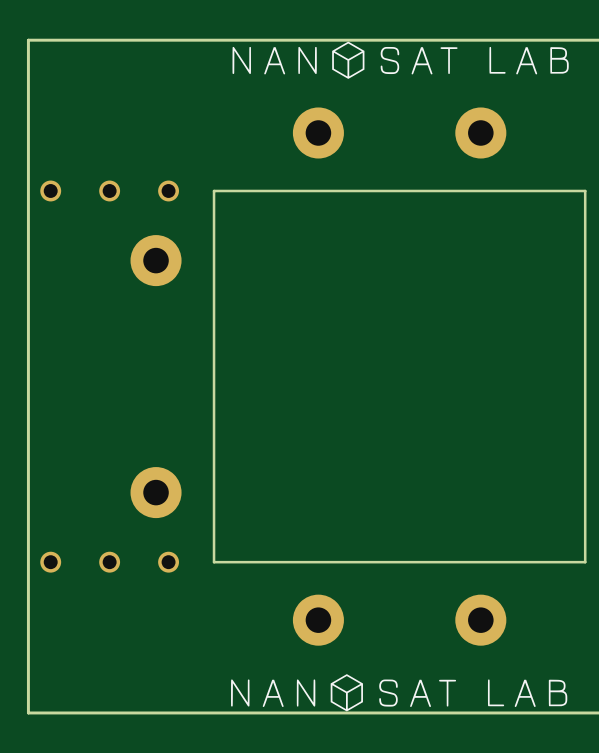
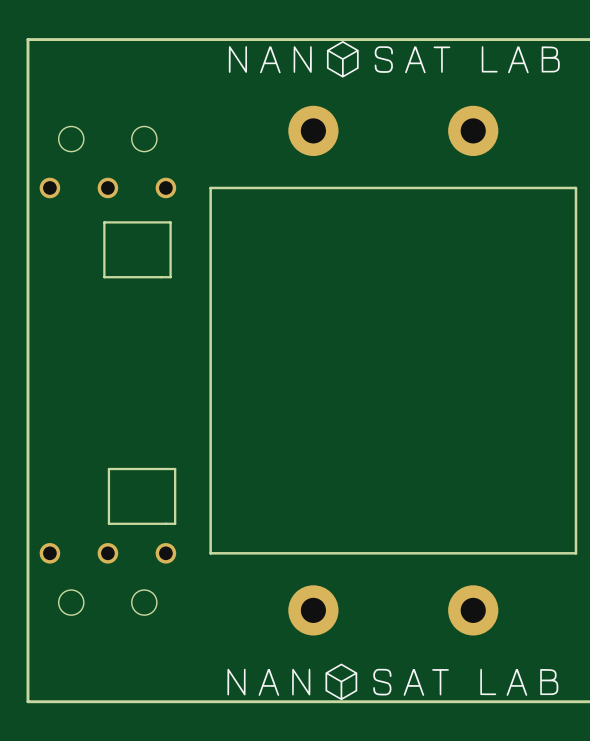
round board edge: none -> [58, 125, 85, 153]
round board edge: none -> [131, 125, 158, 153]
board edge: none -> (170, 222) (104, 222) (104, 277) (170, 277) (170, 222)
part: (156, 260) -> none
board edge: none -> (175, 469) (108, 469) (108, 523) (175, 523) (175, 469)
part: (156, 492) -> none
round board edge: none -> [58, 589, 85, 616]
round board edge: none -> [131, 589, 158, 616]

